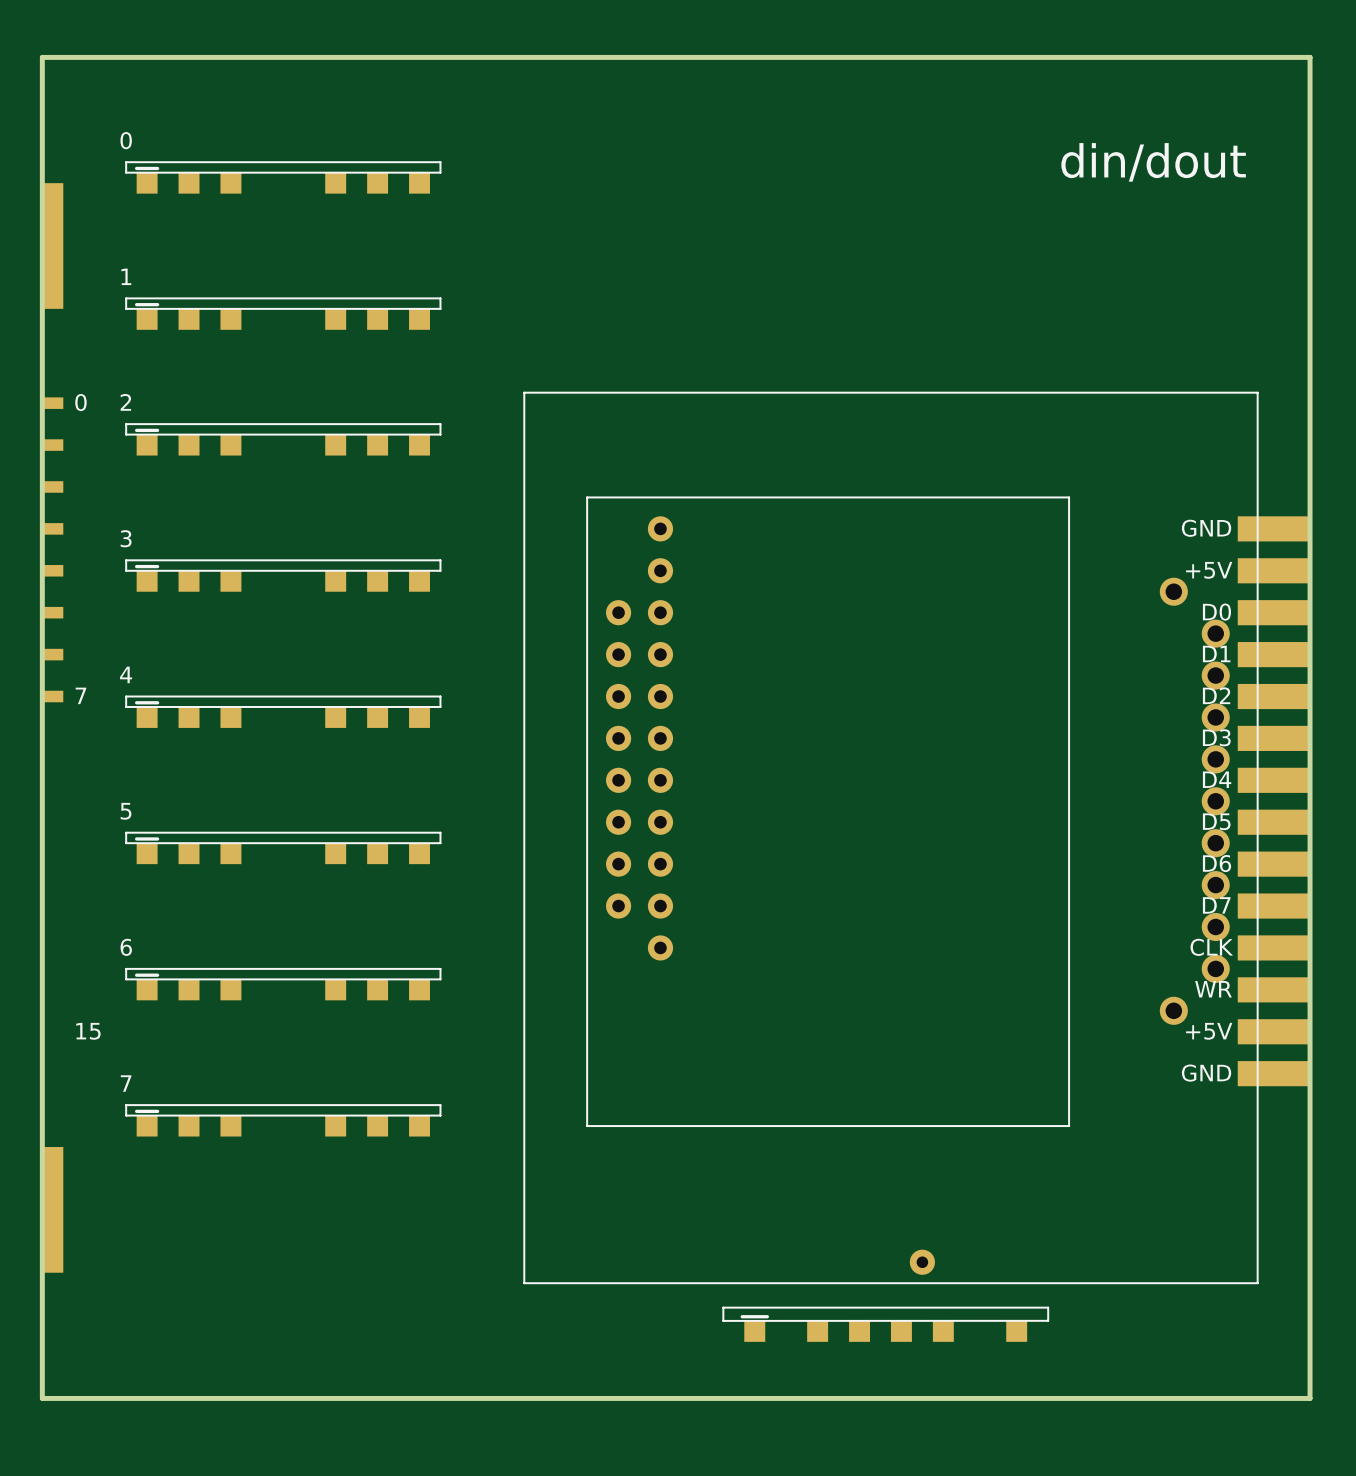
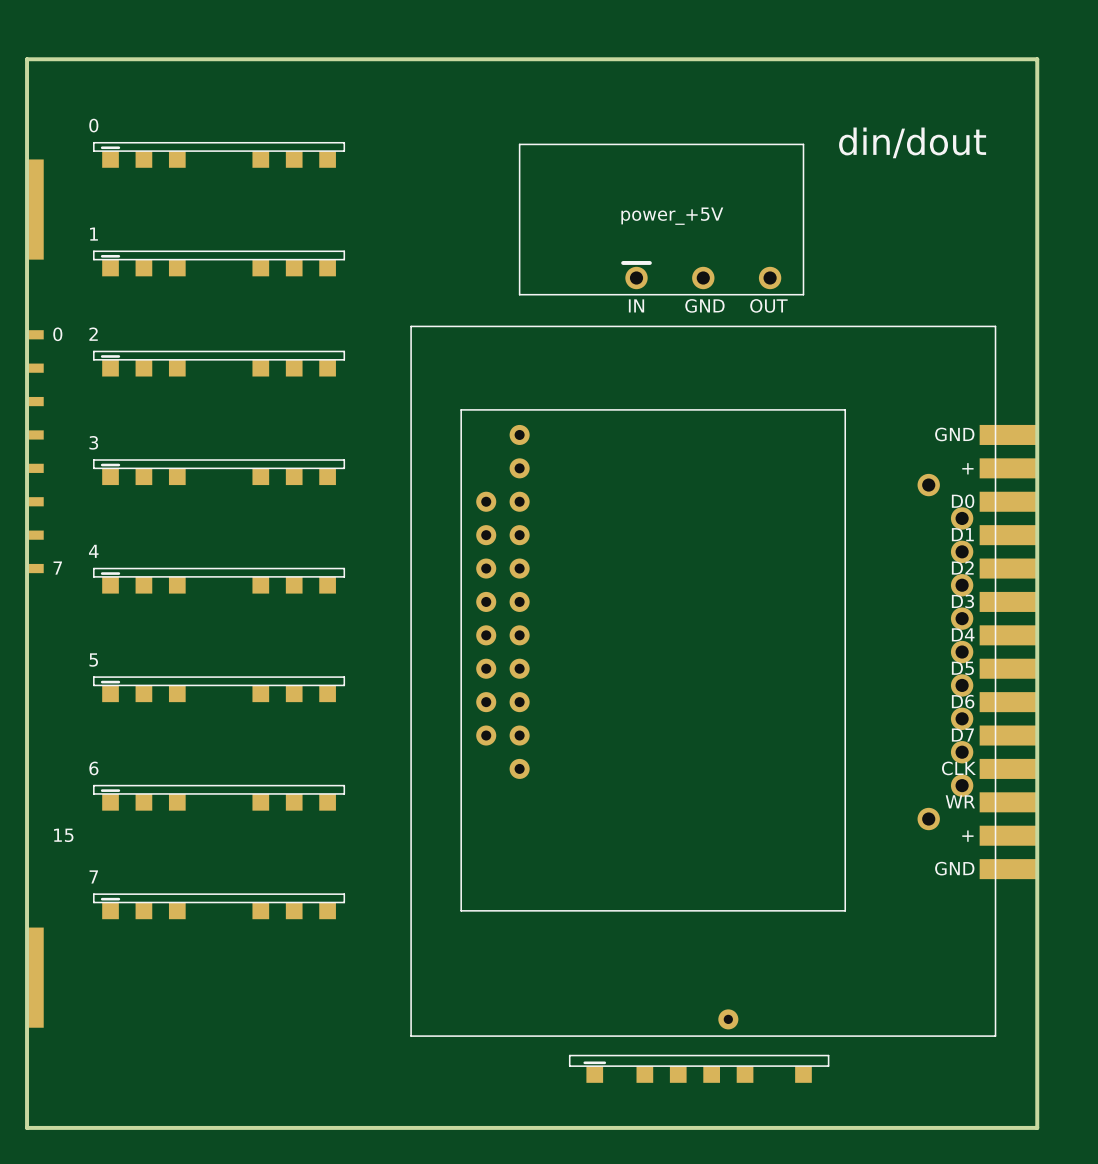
part: none -> power_+5V (661, 219)
part text: +5V (1209, 570) -> + (967, 468)
part text: +5V (1209, 1031) -> + (967, 836)

